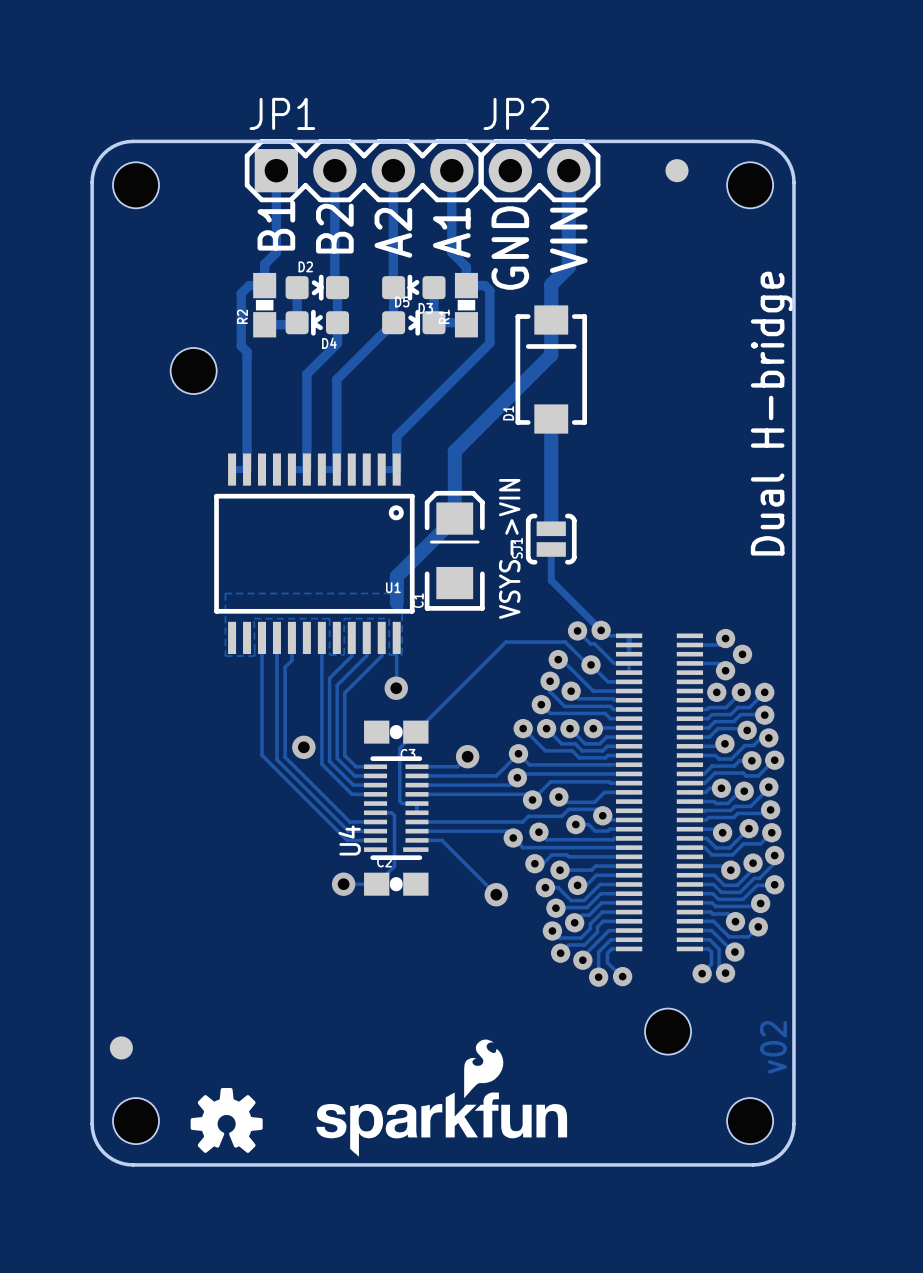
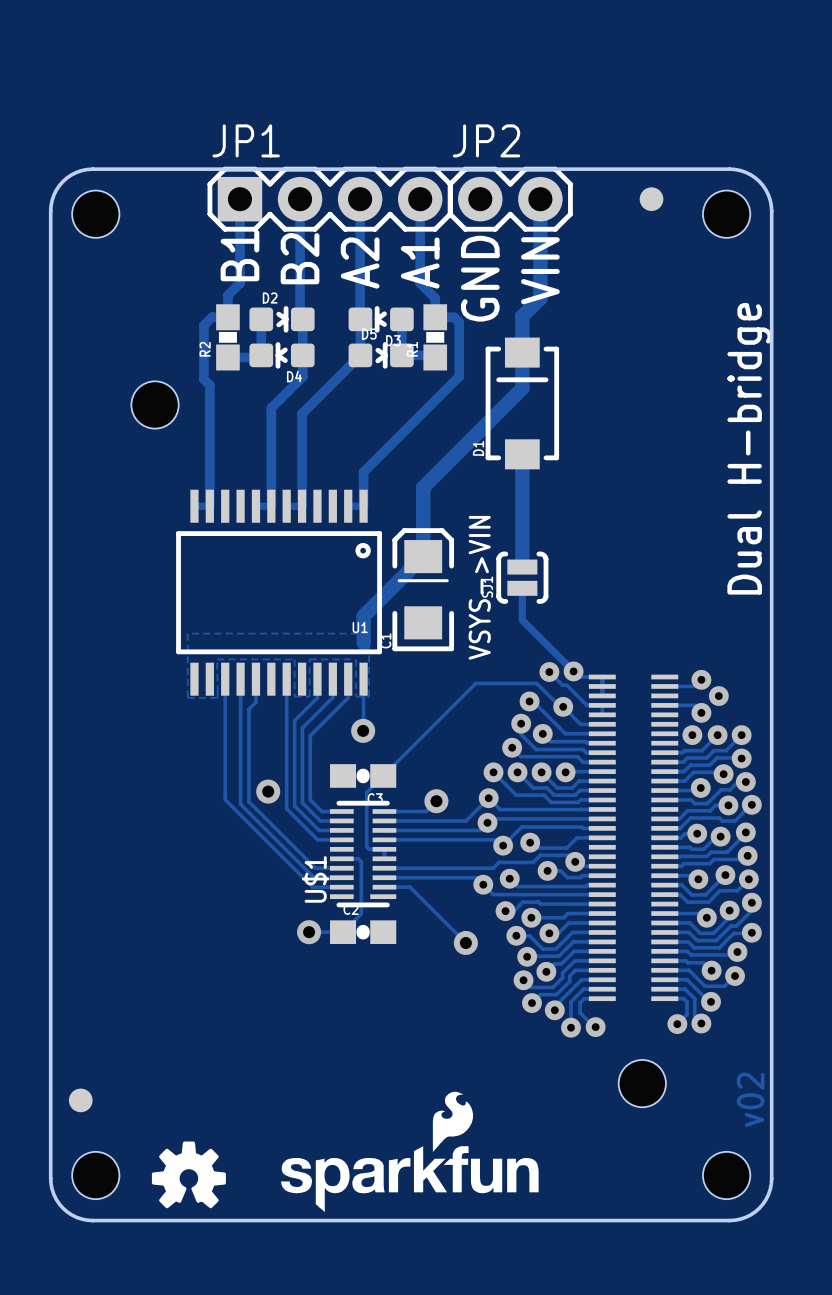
U4 name: U4 (349, 840) -> U$1 (315, 879)

